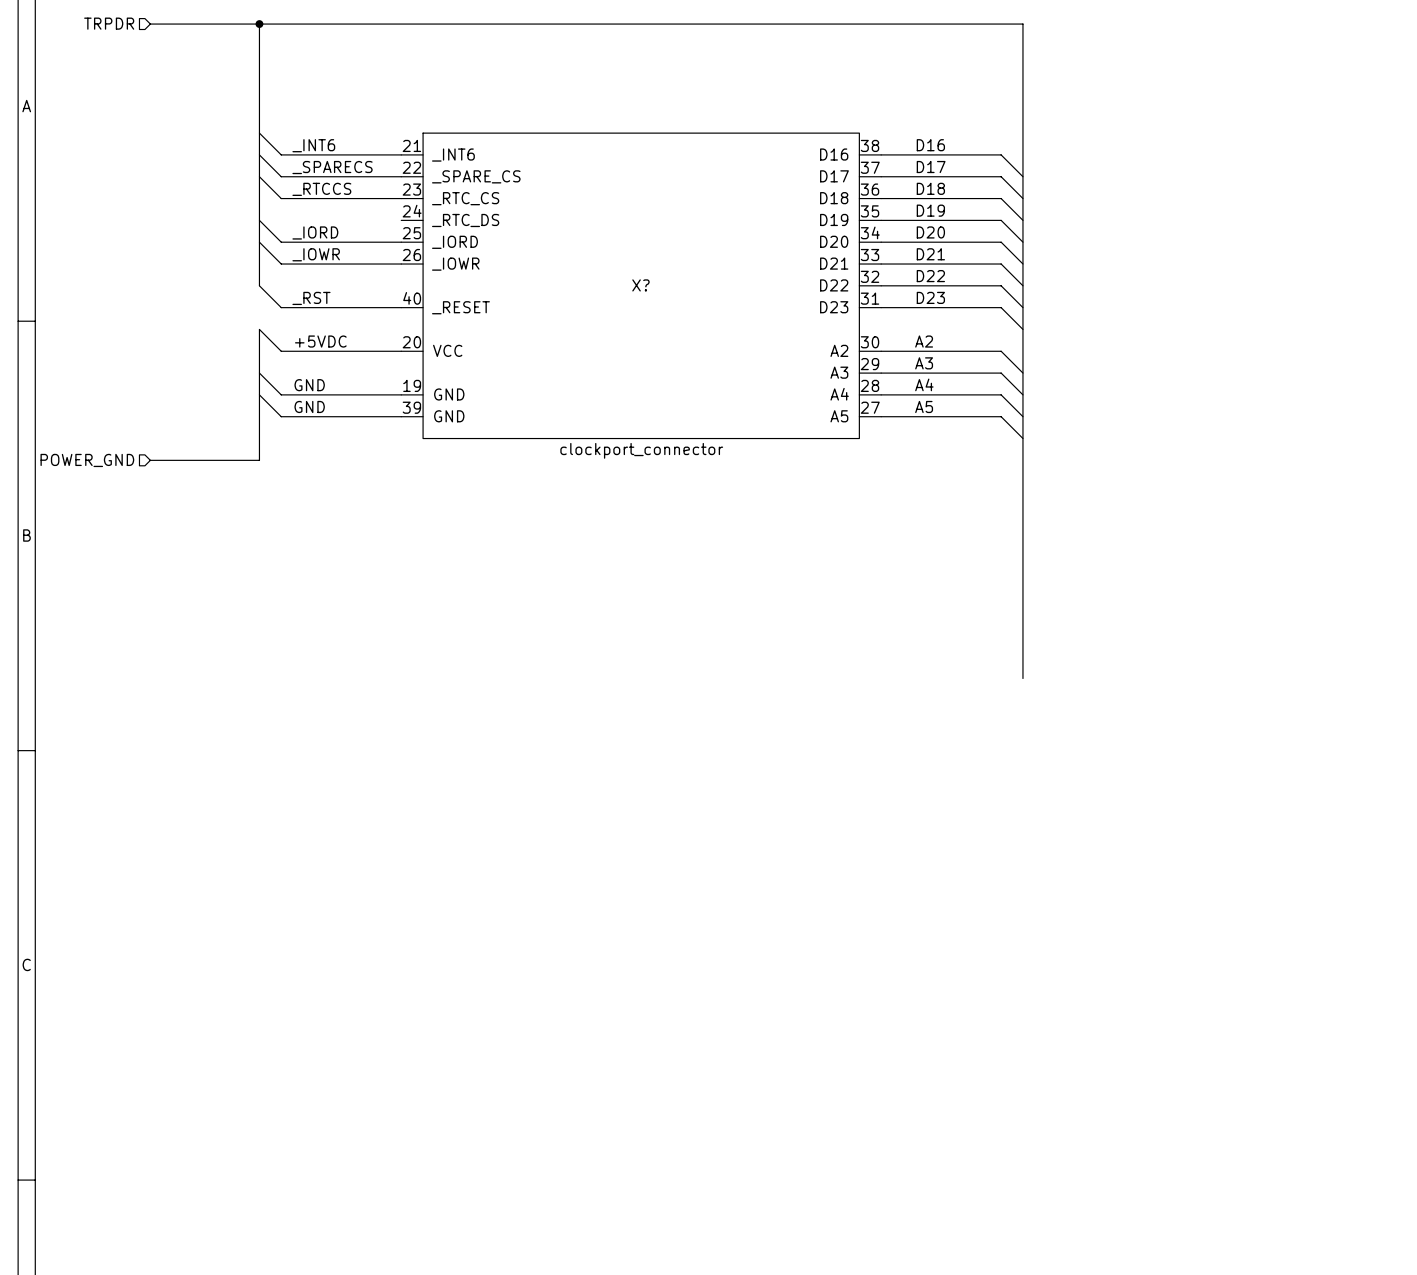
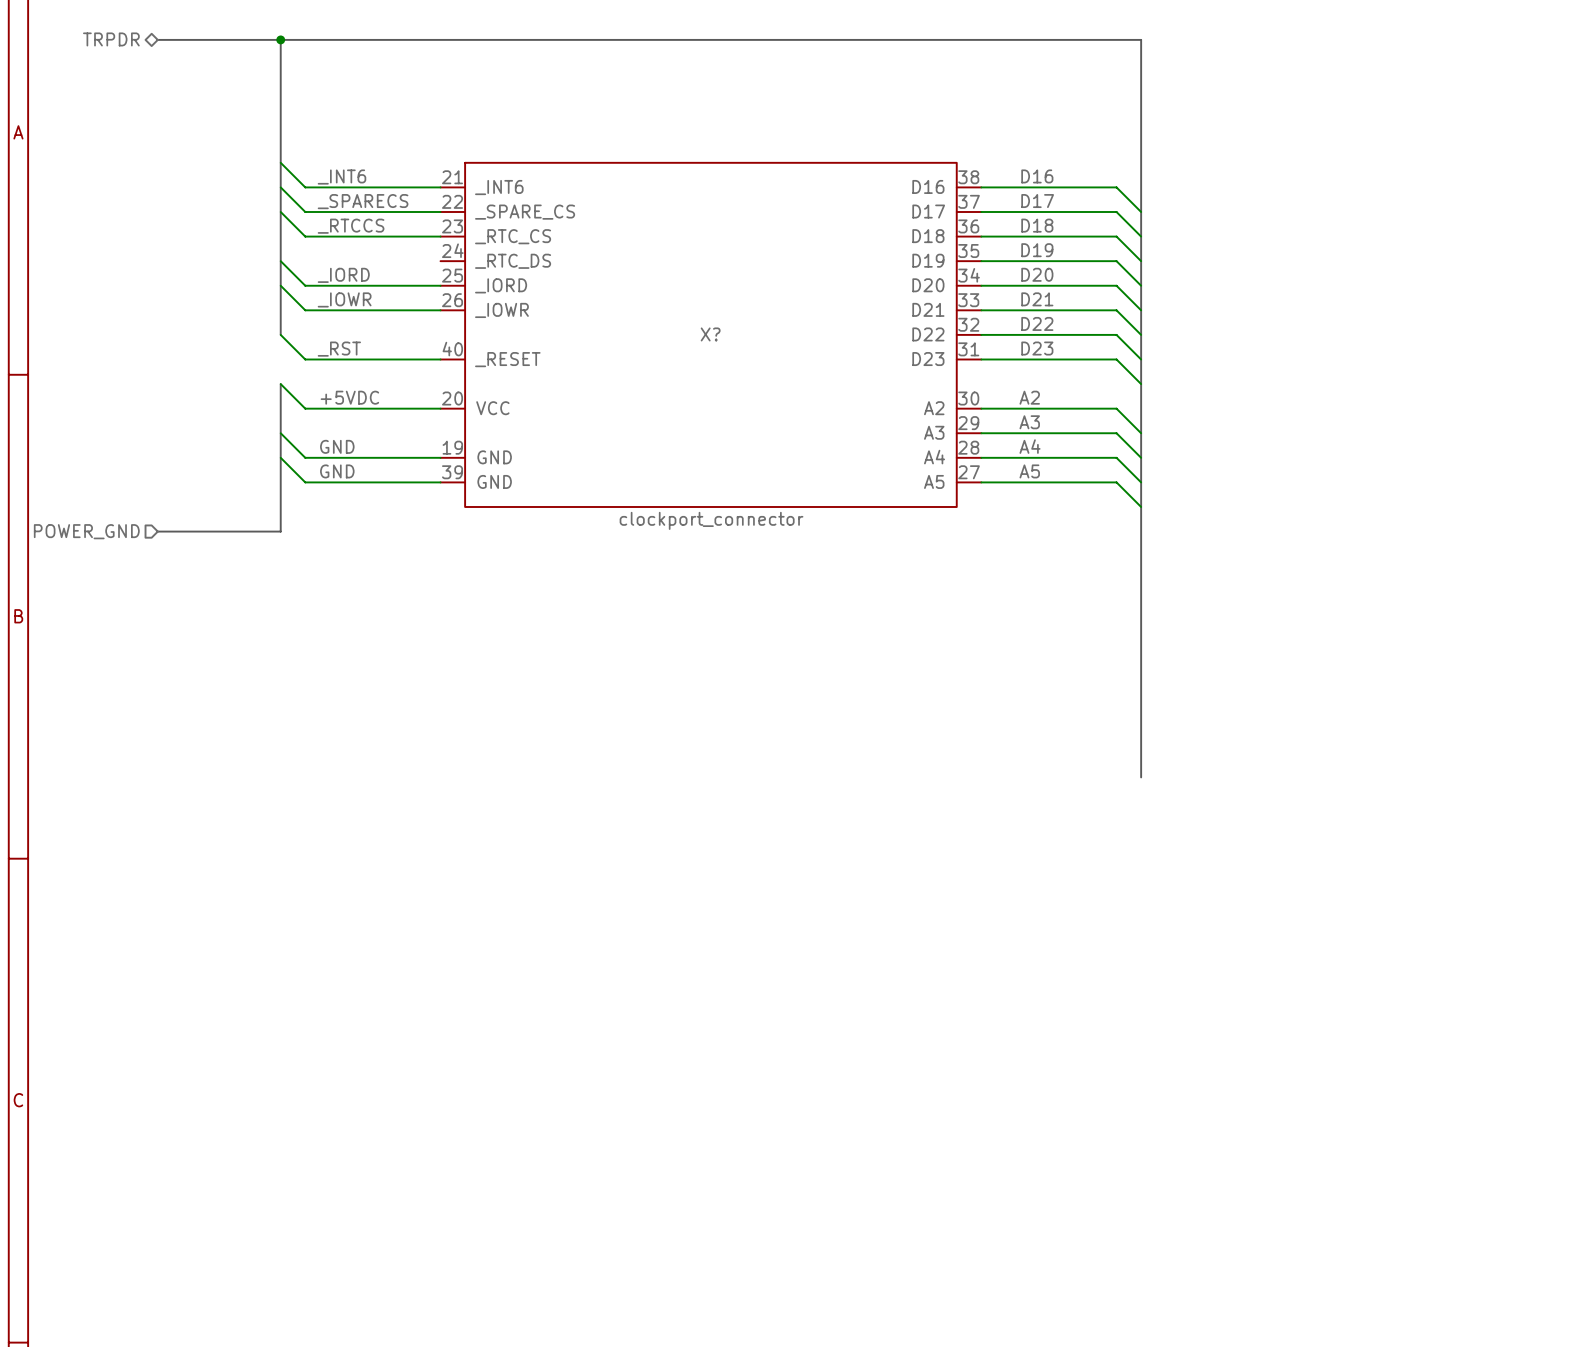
hierarchical label shape: input (109, 23) -> bidirectional (111, 39)

